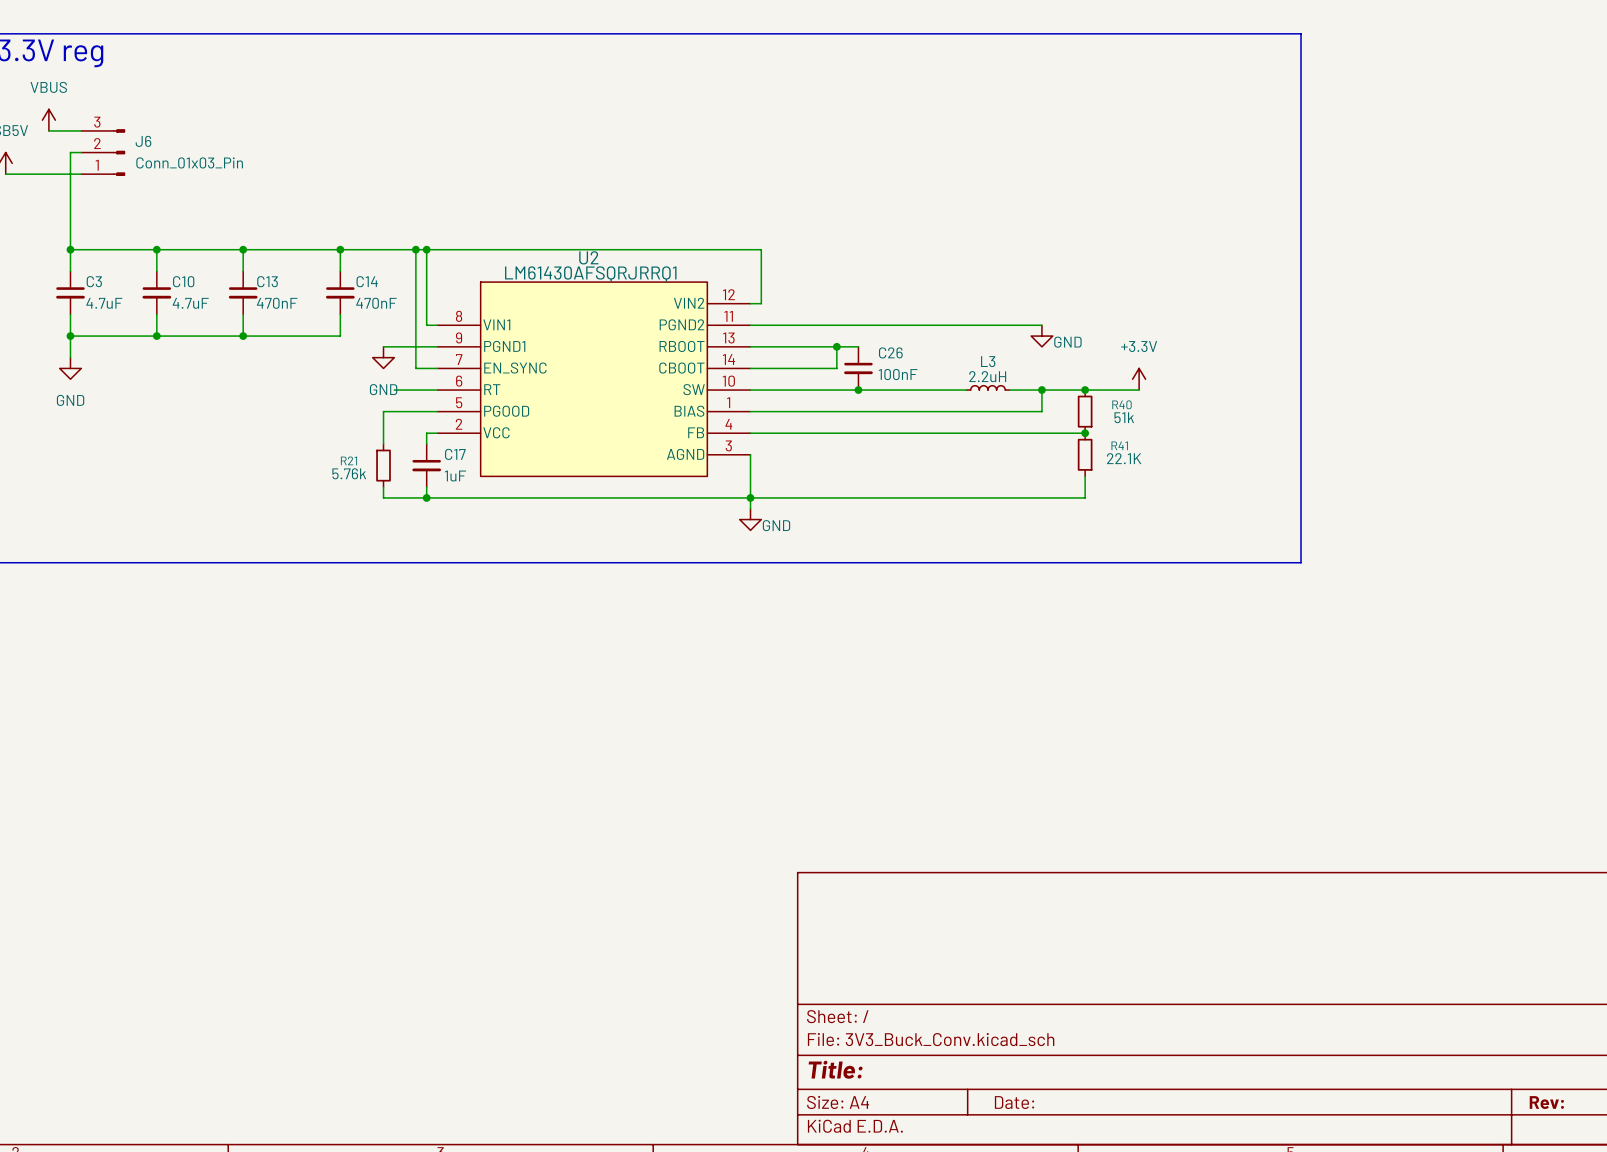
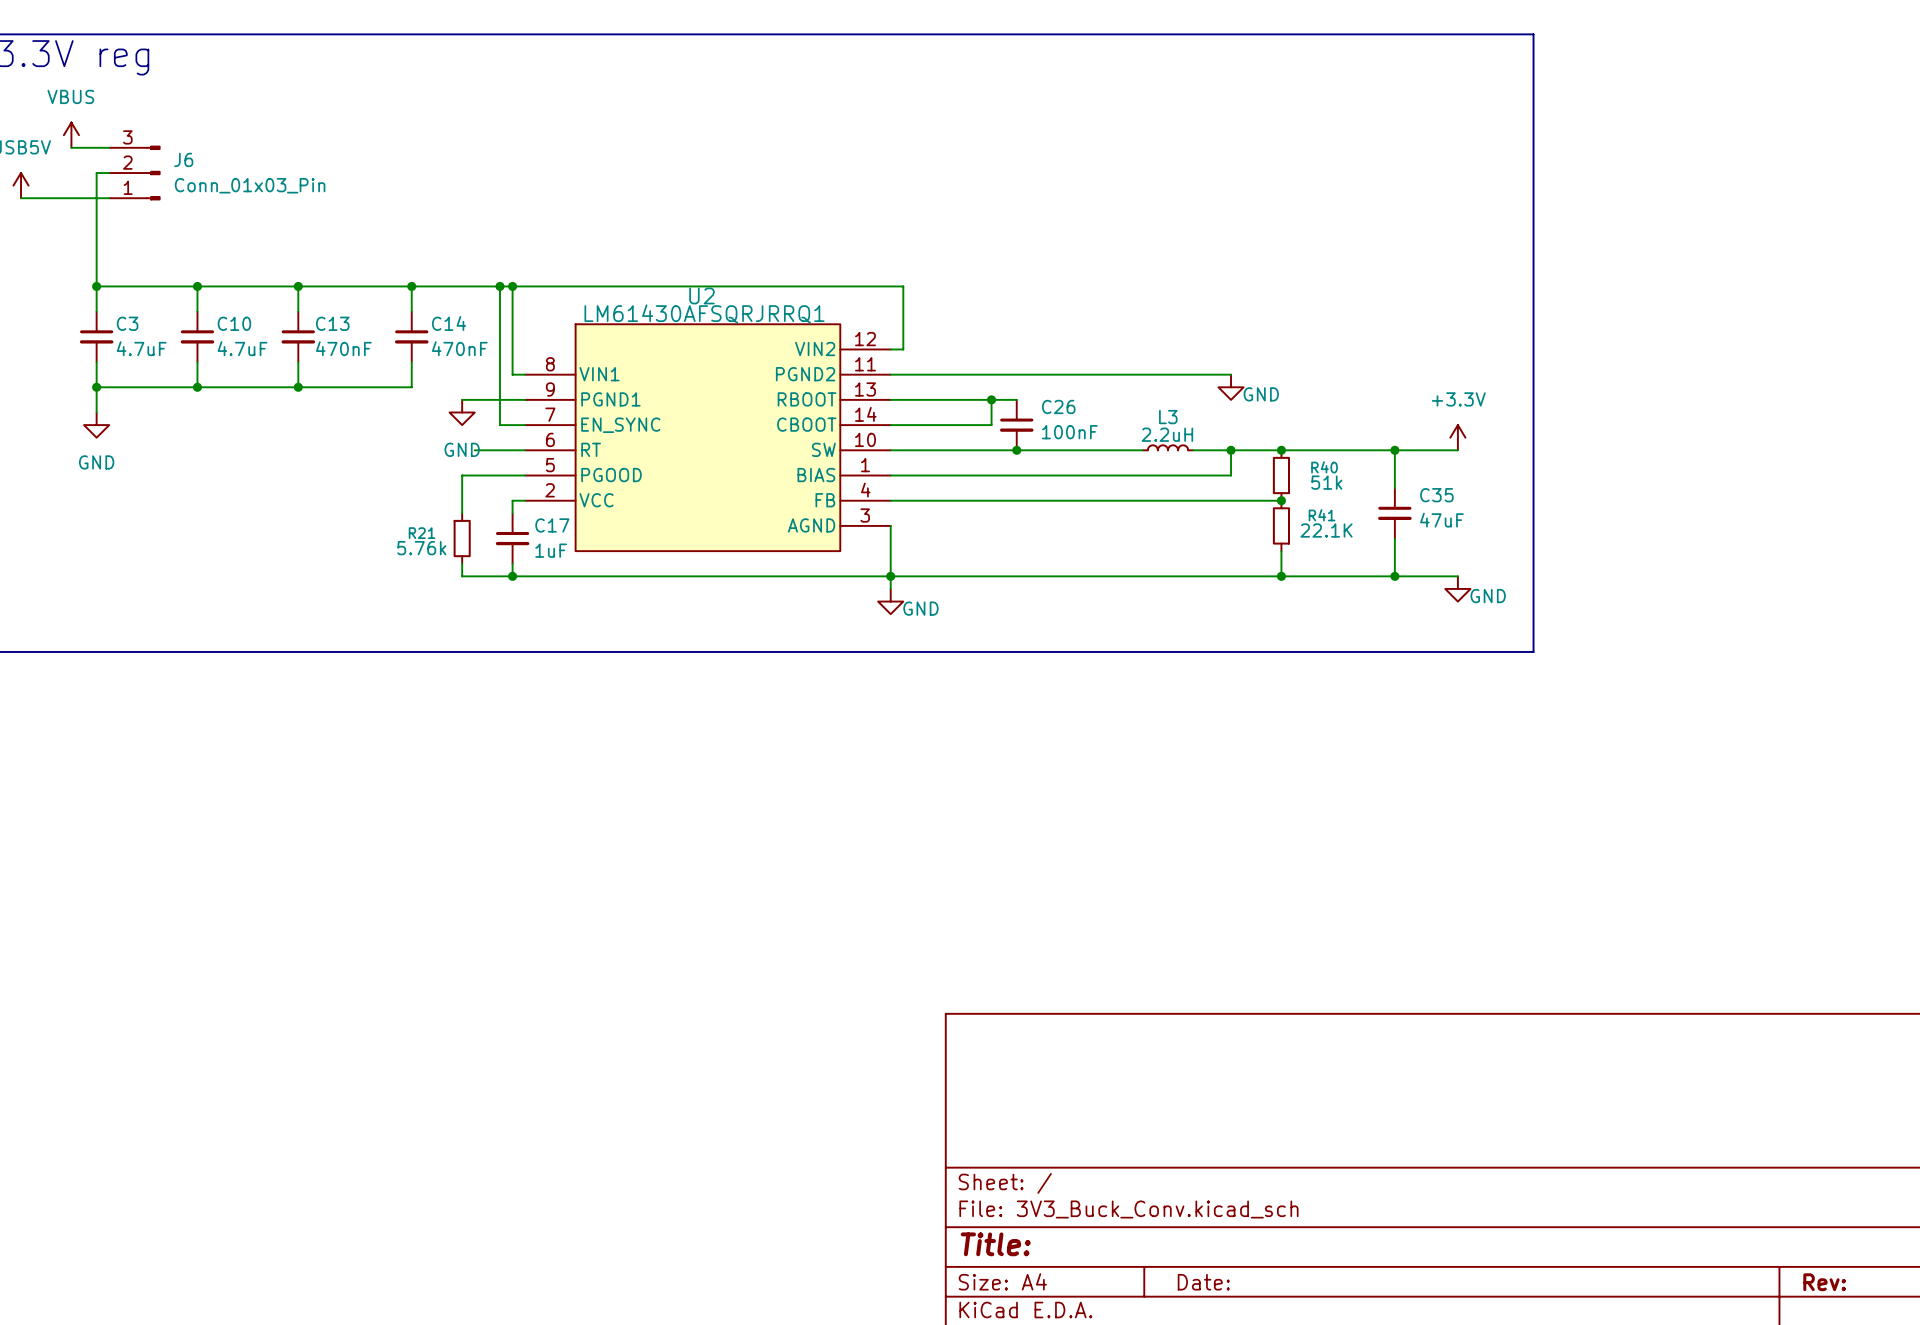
power symbol position: +3.3V (1139, 379) -> +3.3V (1457, 437)
wire: none -> (1344, 450) (1457, 450)
wire: none -> (1394, 450) (1394, 488)
junction: none -> (1394, 450)
C35: none -> 47uF (1394, 513)
wire: none -> (1394, 538) (1394, 576)
wire: none -> (1281, 576) (1457, 576)
junction: none -> (1281, 576)
junction: none -> (1394, 576)
power symbol: none -> GND (1457, 588)

